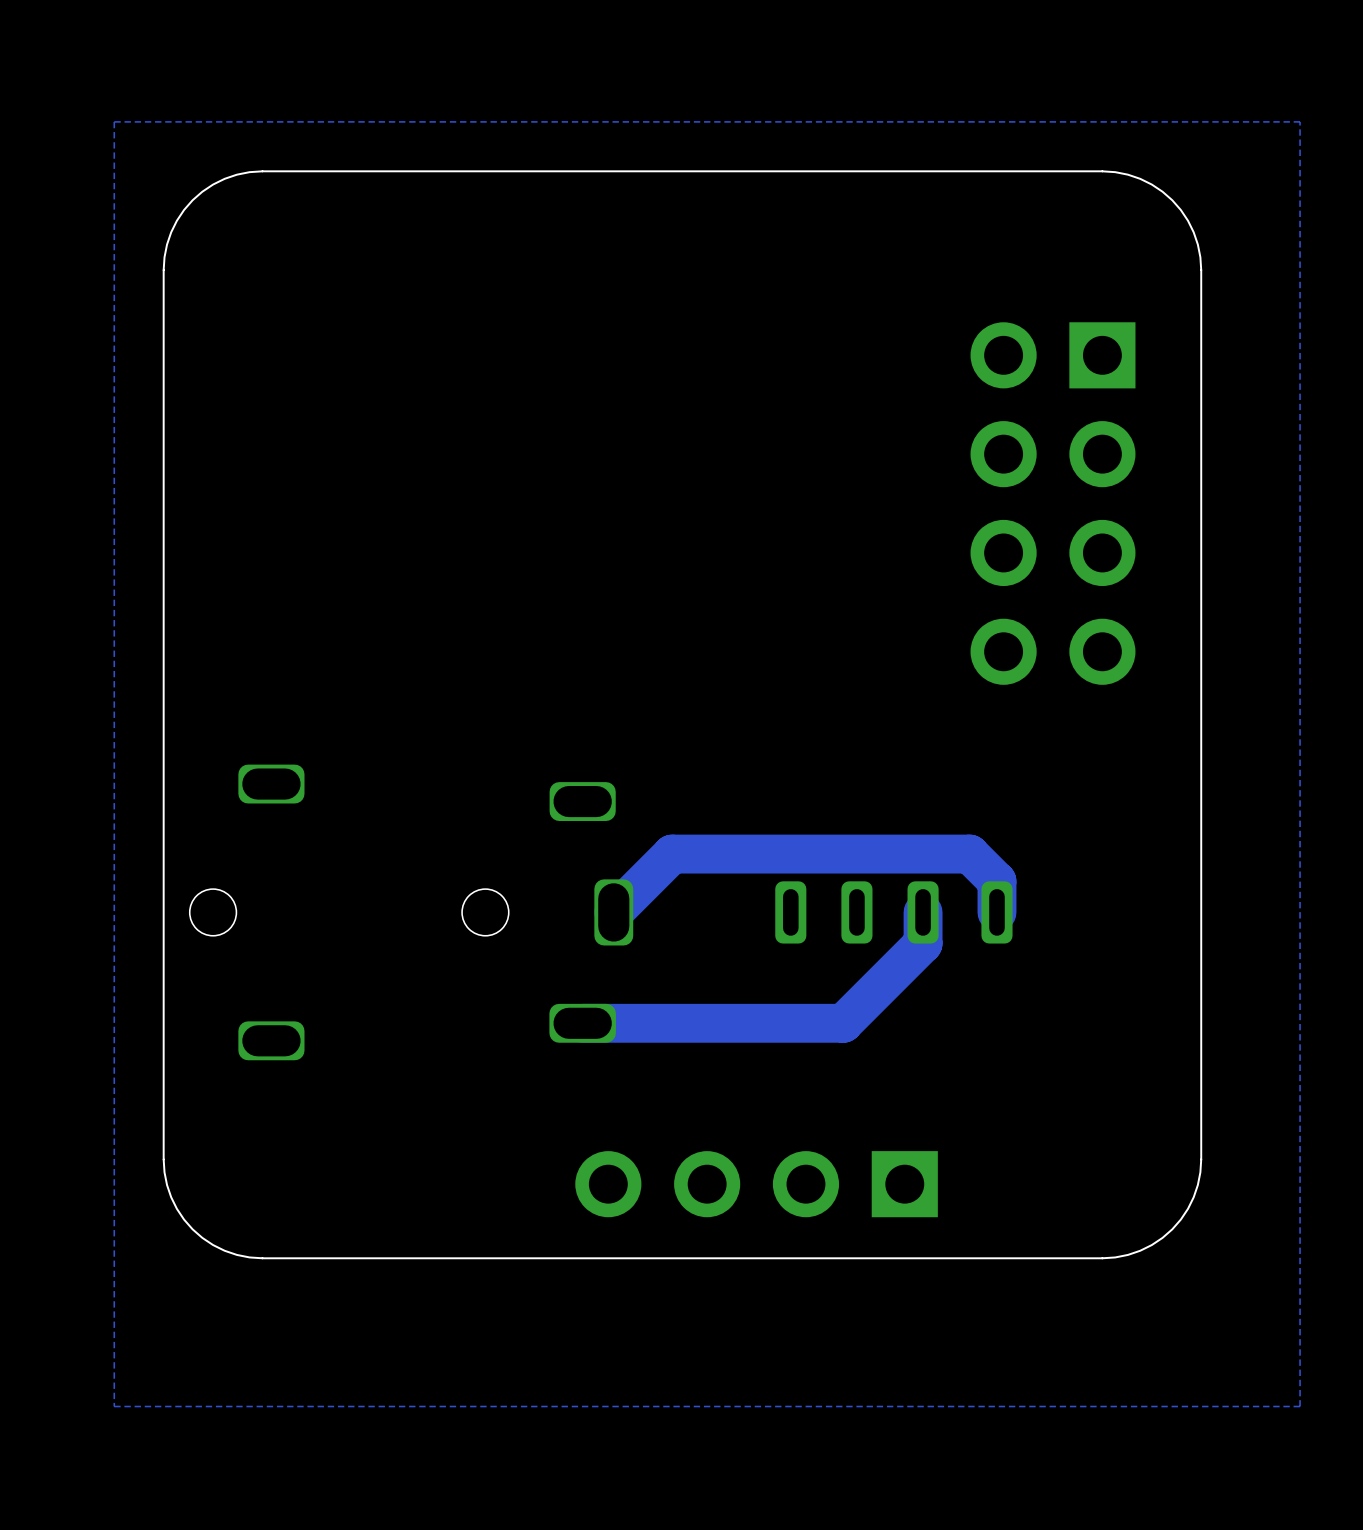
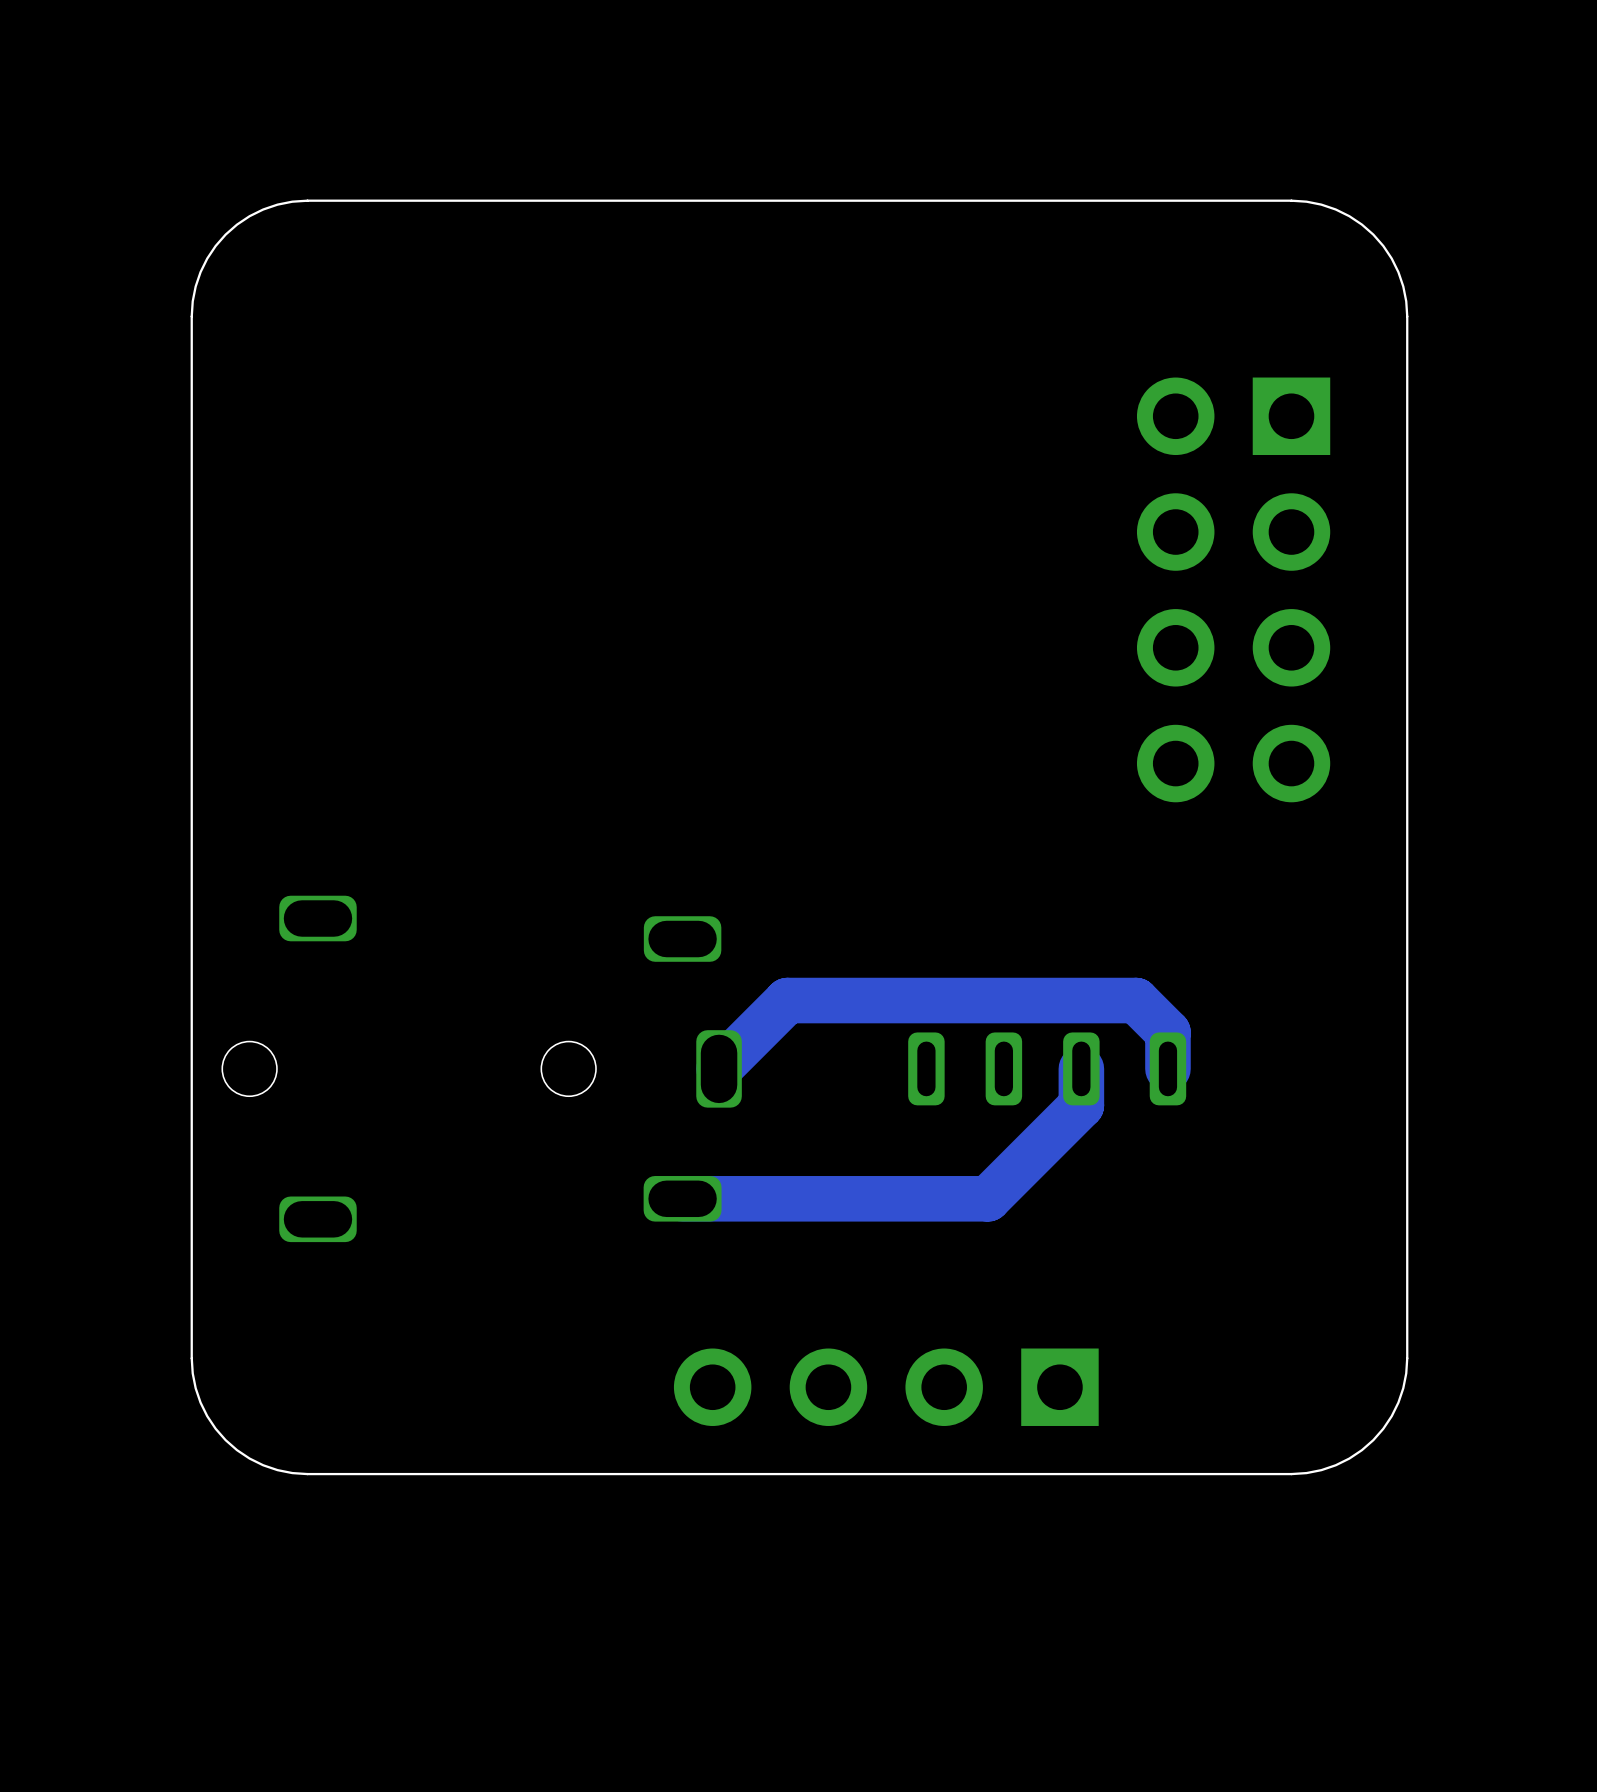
zone outline: (1300, 121) (1300, 1406) (114, 1406) (114, 121) (1300, 121) -> none

